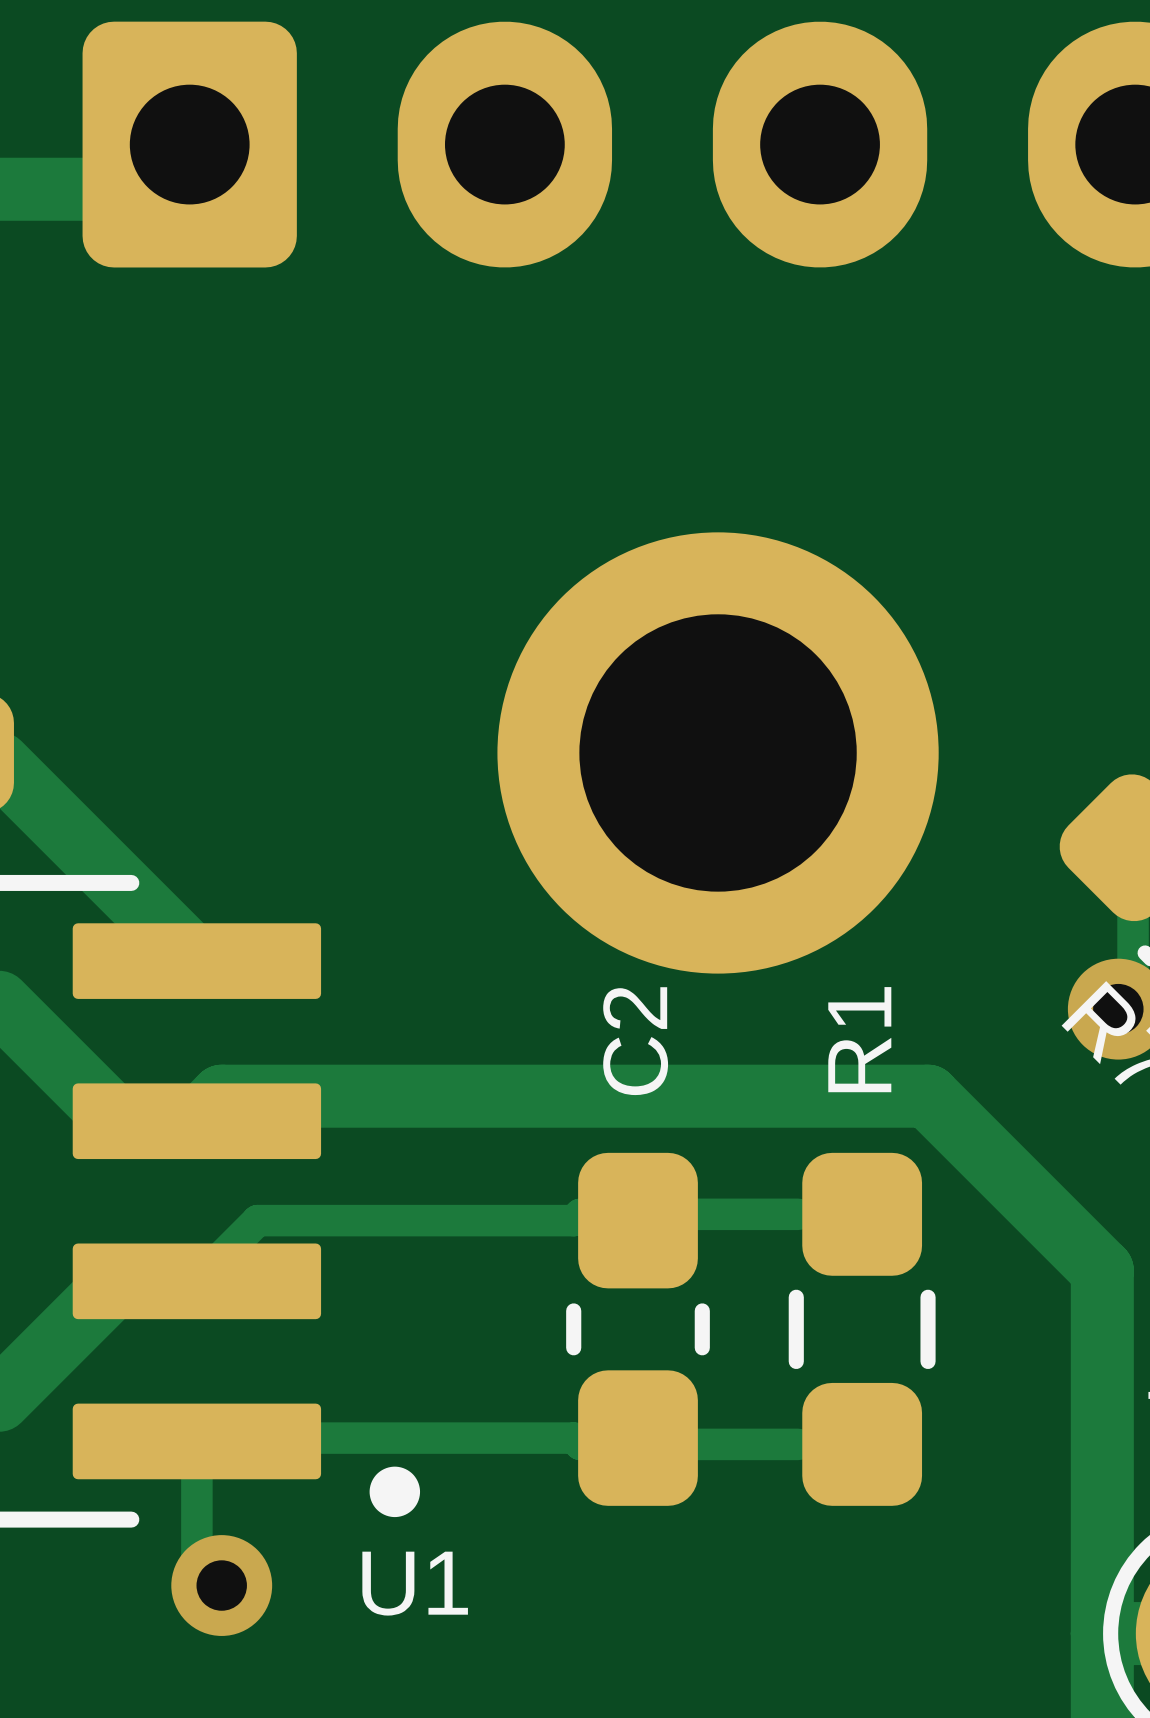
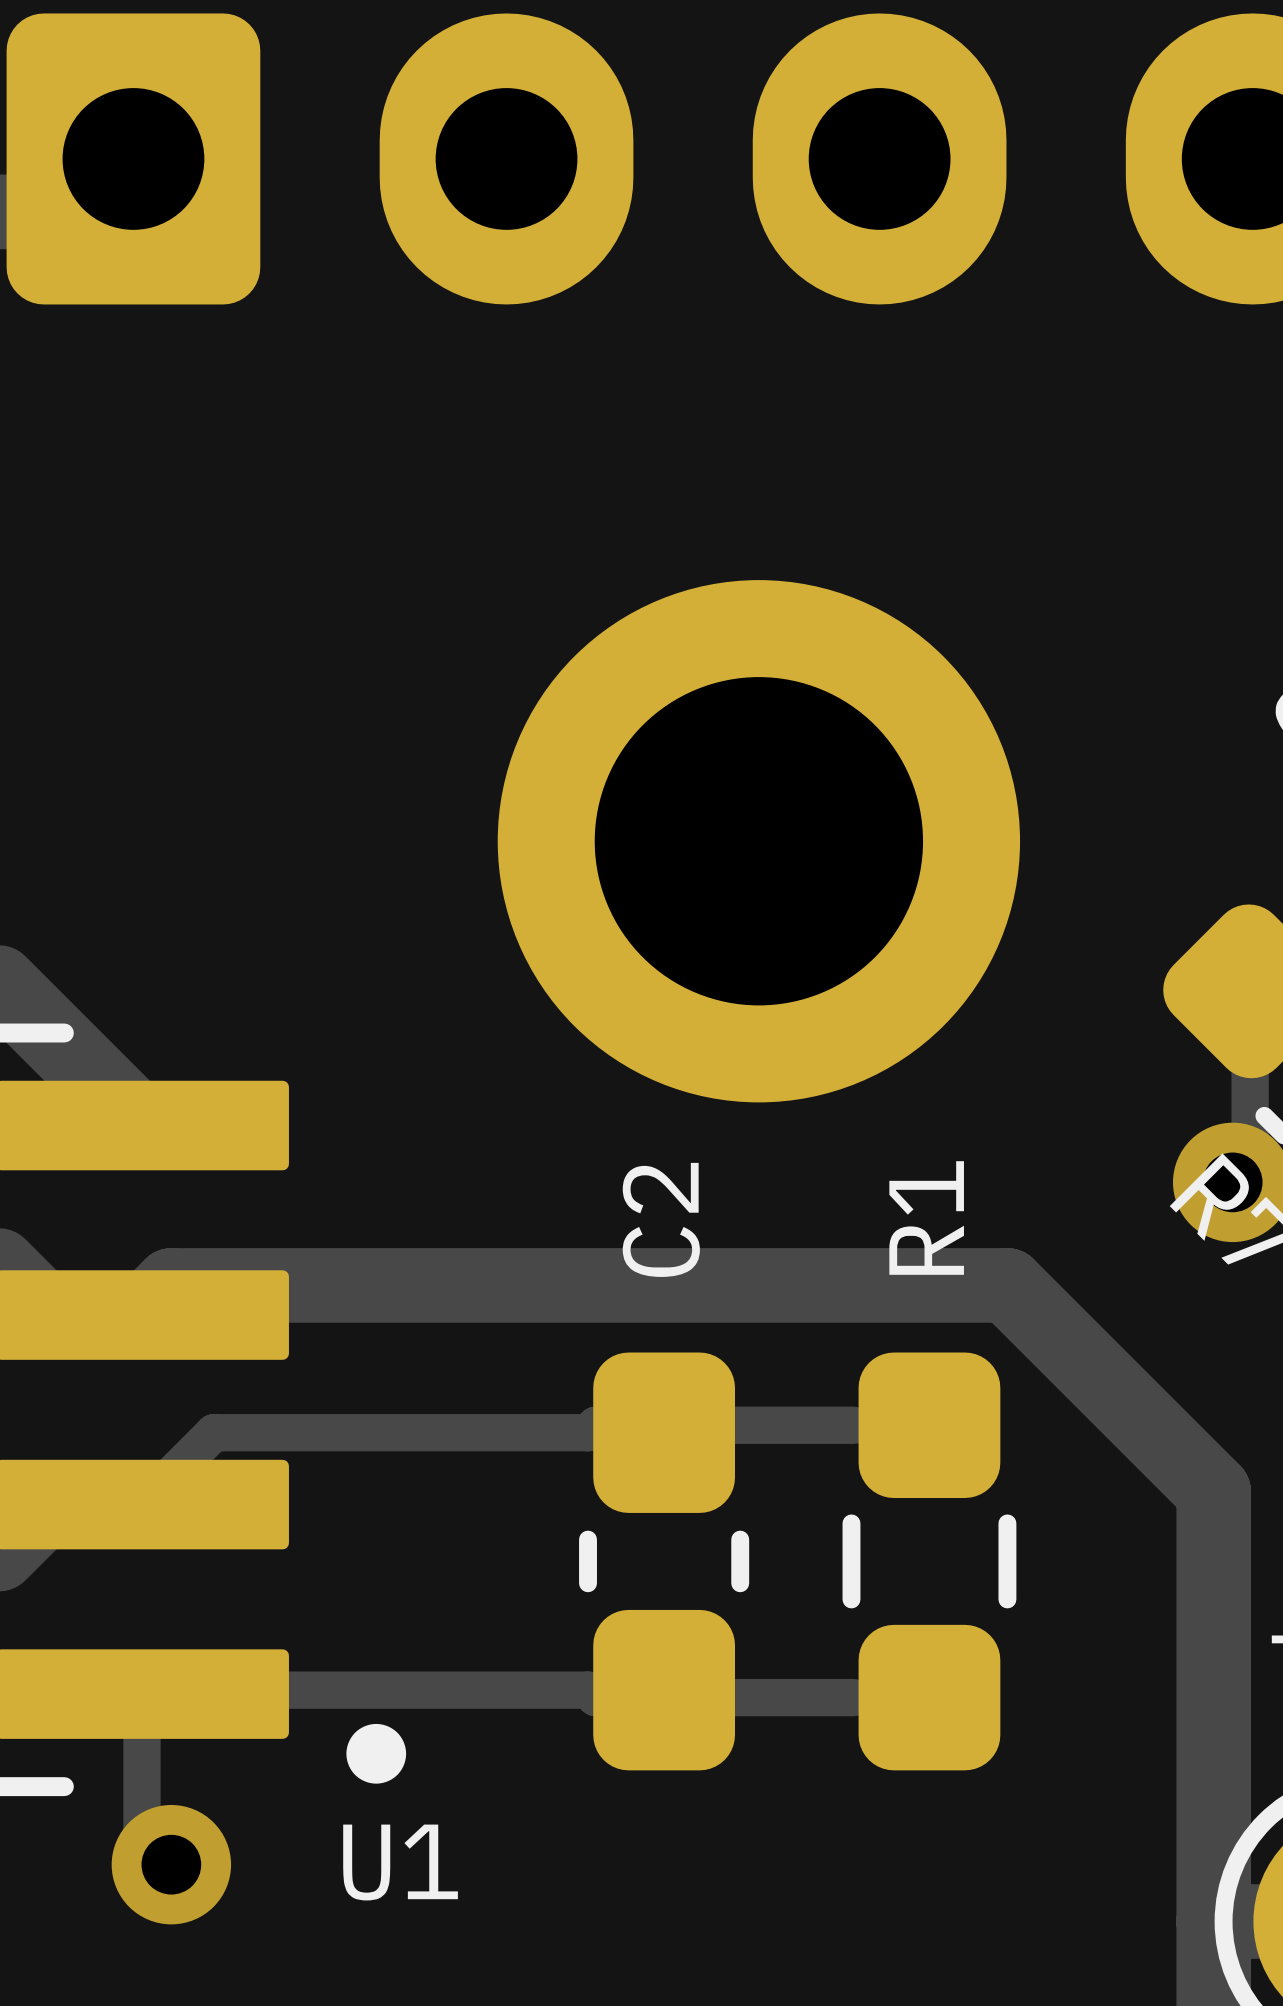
part position: (718, 752) -> (758, 841)

